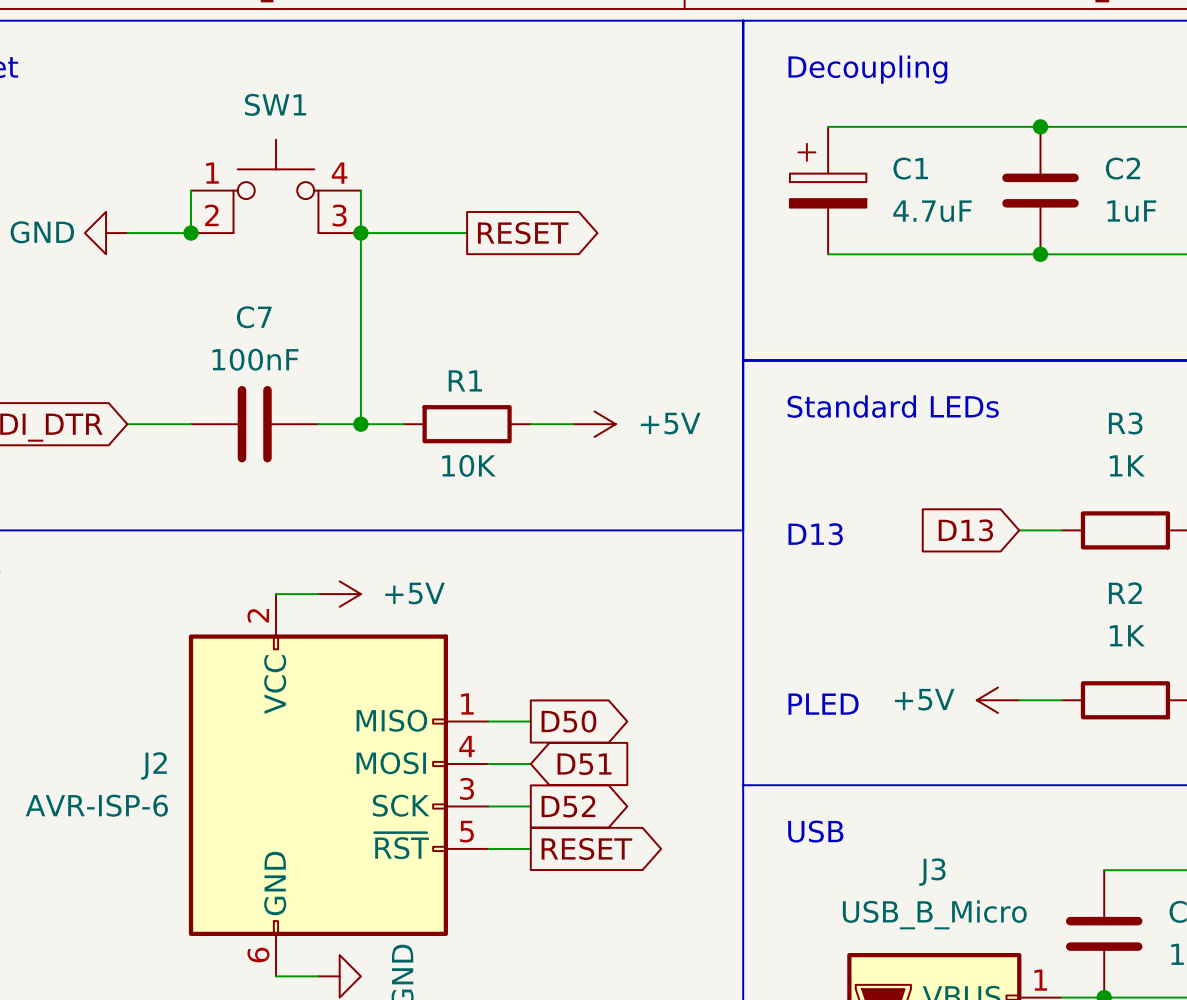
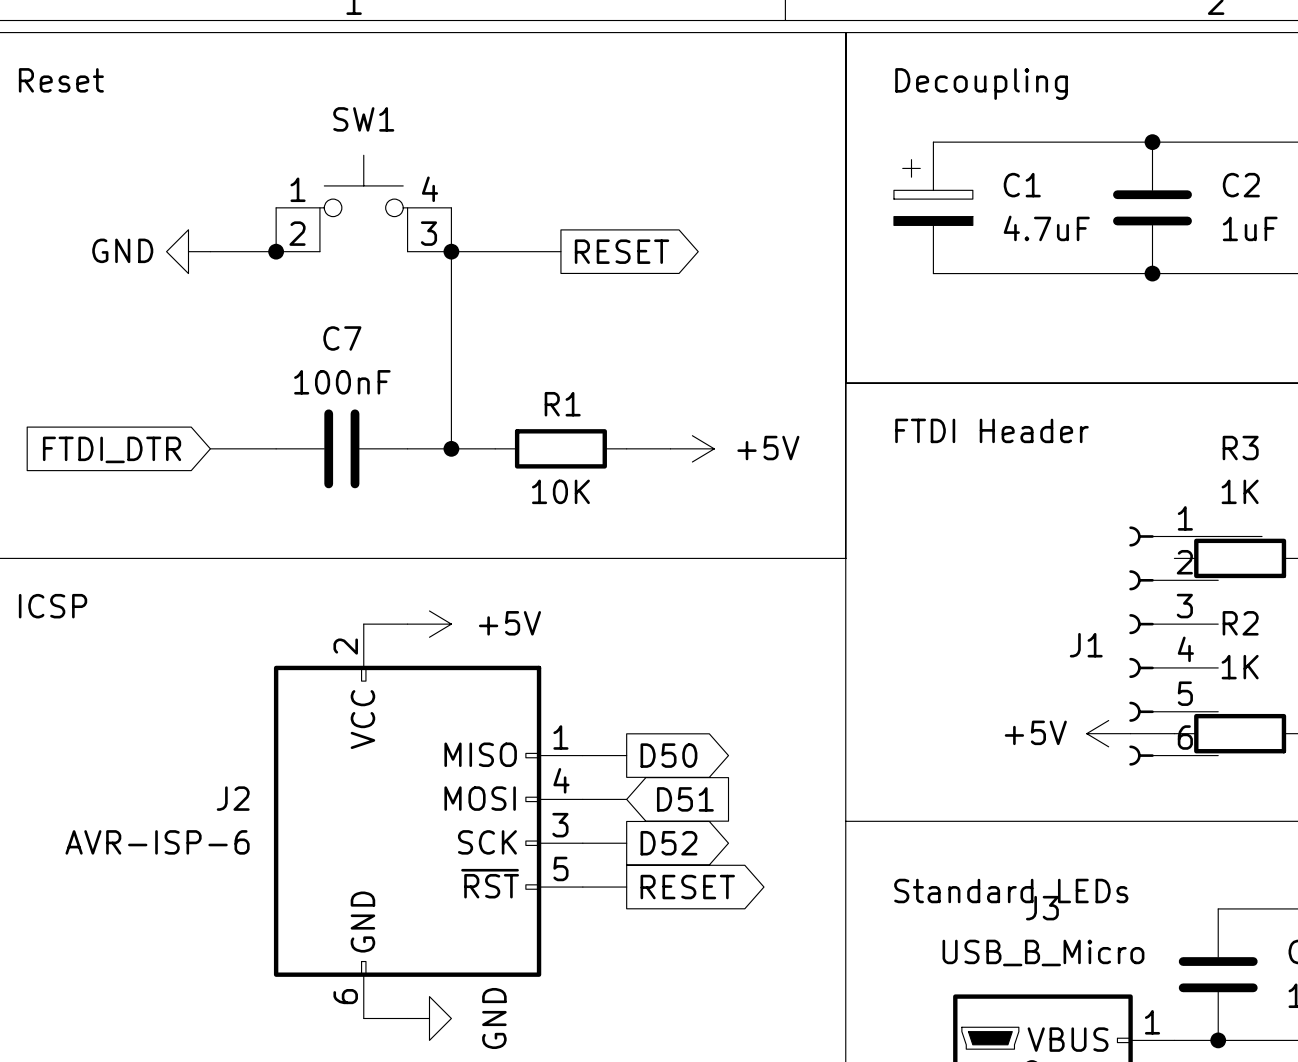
text: Standard LEDs (893, 406) -> FTDI Header (991, 430)
global label: D13 (965, 530) -> none
wire: (1019, 530) (1061, 530) -> (1218, 536) (1262, 536)
text: D13 (815, 534) -> none
J1: none -> (1173, 646)
text: PLED (823, 704) -> none
text: USB (815, 831) -> none
text: none -> Standard LEDs (1011, 891)

